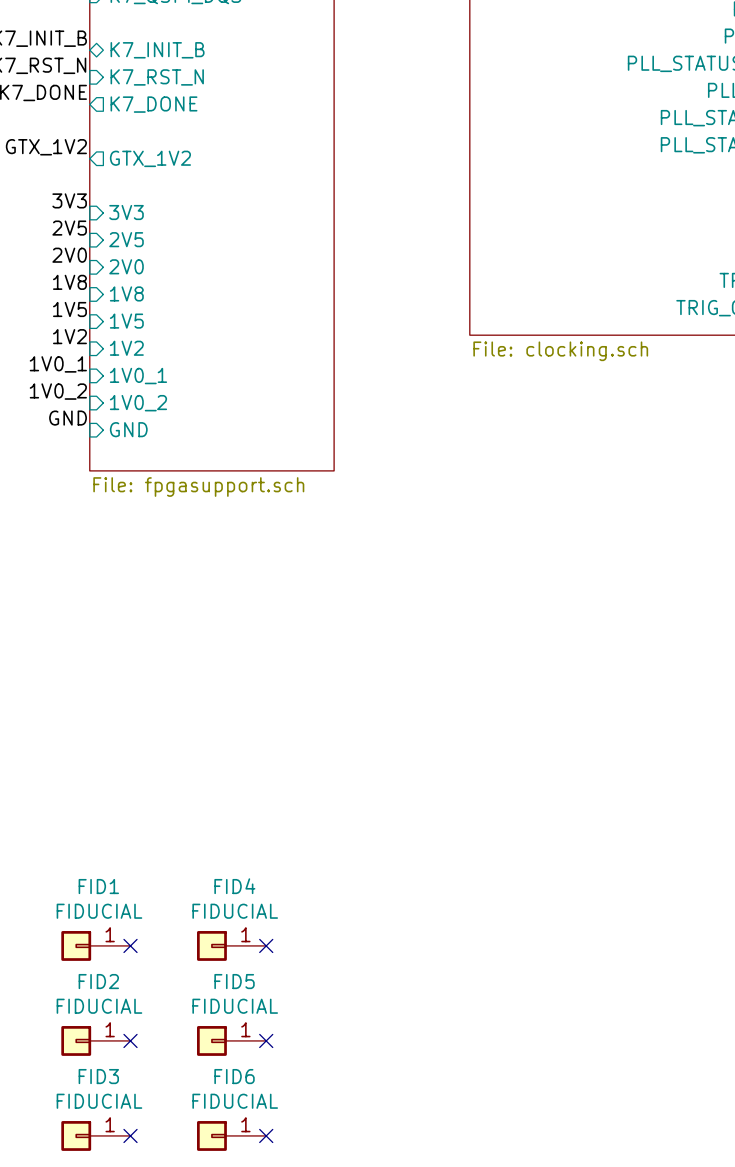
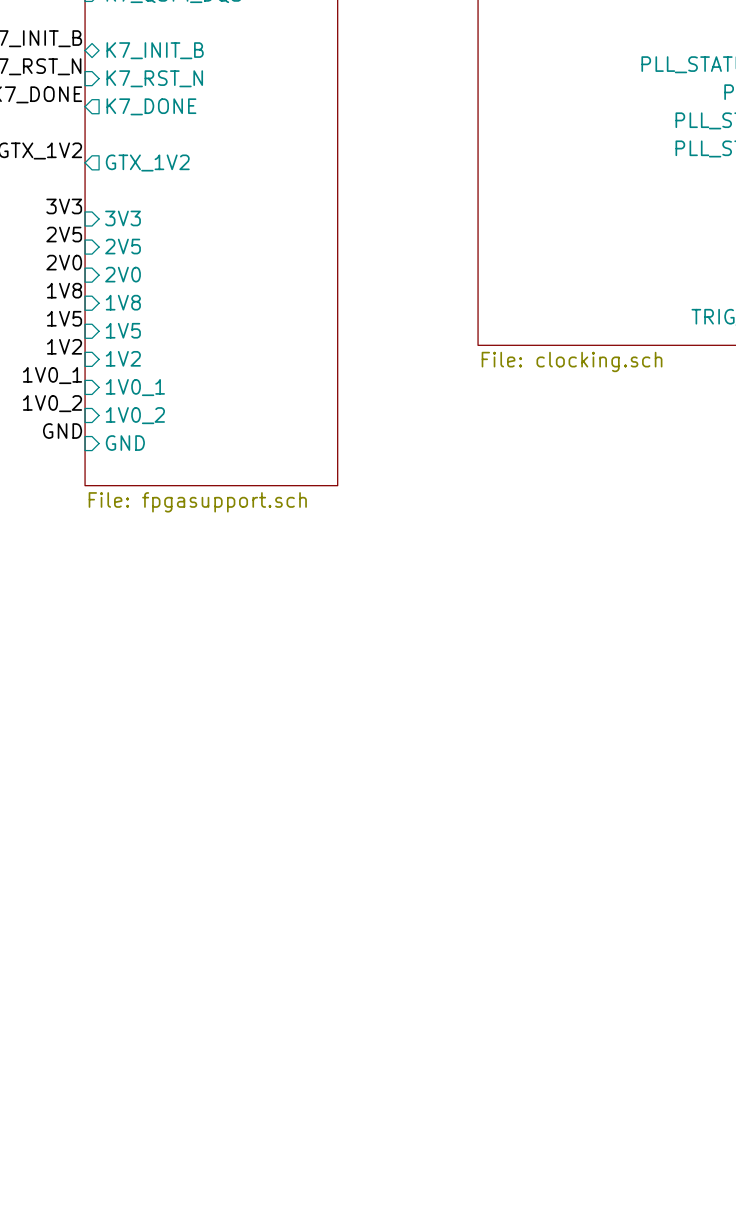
FID1: FIDUCIAL (95, 945) -> none
no-connect mark: (130, 945) -> none
FID4: FIDUCIAL (231, 945) -> none
no-connect mark: (266, 945) -> none
FID2: FIDUCIAL (95, 1040) -> none
no-connect mark: (130, 1040) -> none
FID5: FIDUCIAL (231, 1040) -> none
no-connect mark: (266, 1040) -> none
FID3: FIDUCIAL (95, 1135) -> none
no-connect mark: (130, 1135) -> none
FID6: FIDUCIAL (231, 1135) -> none
no-connect mark: (266, 1135) -> none

